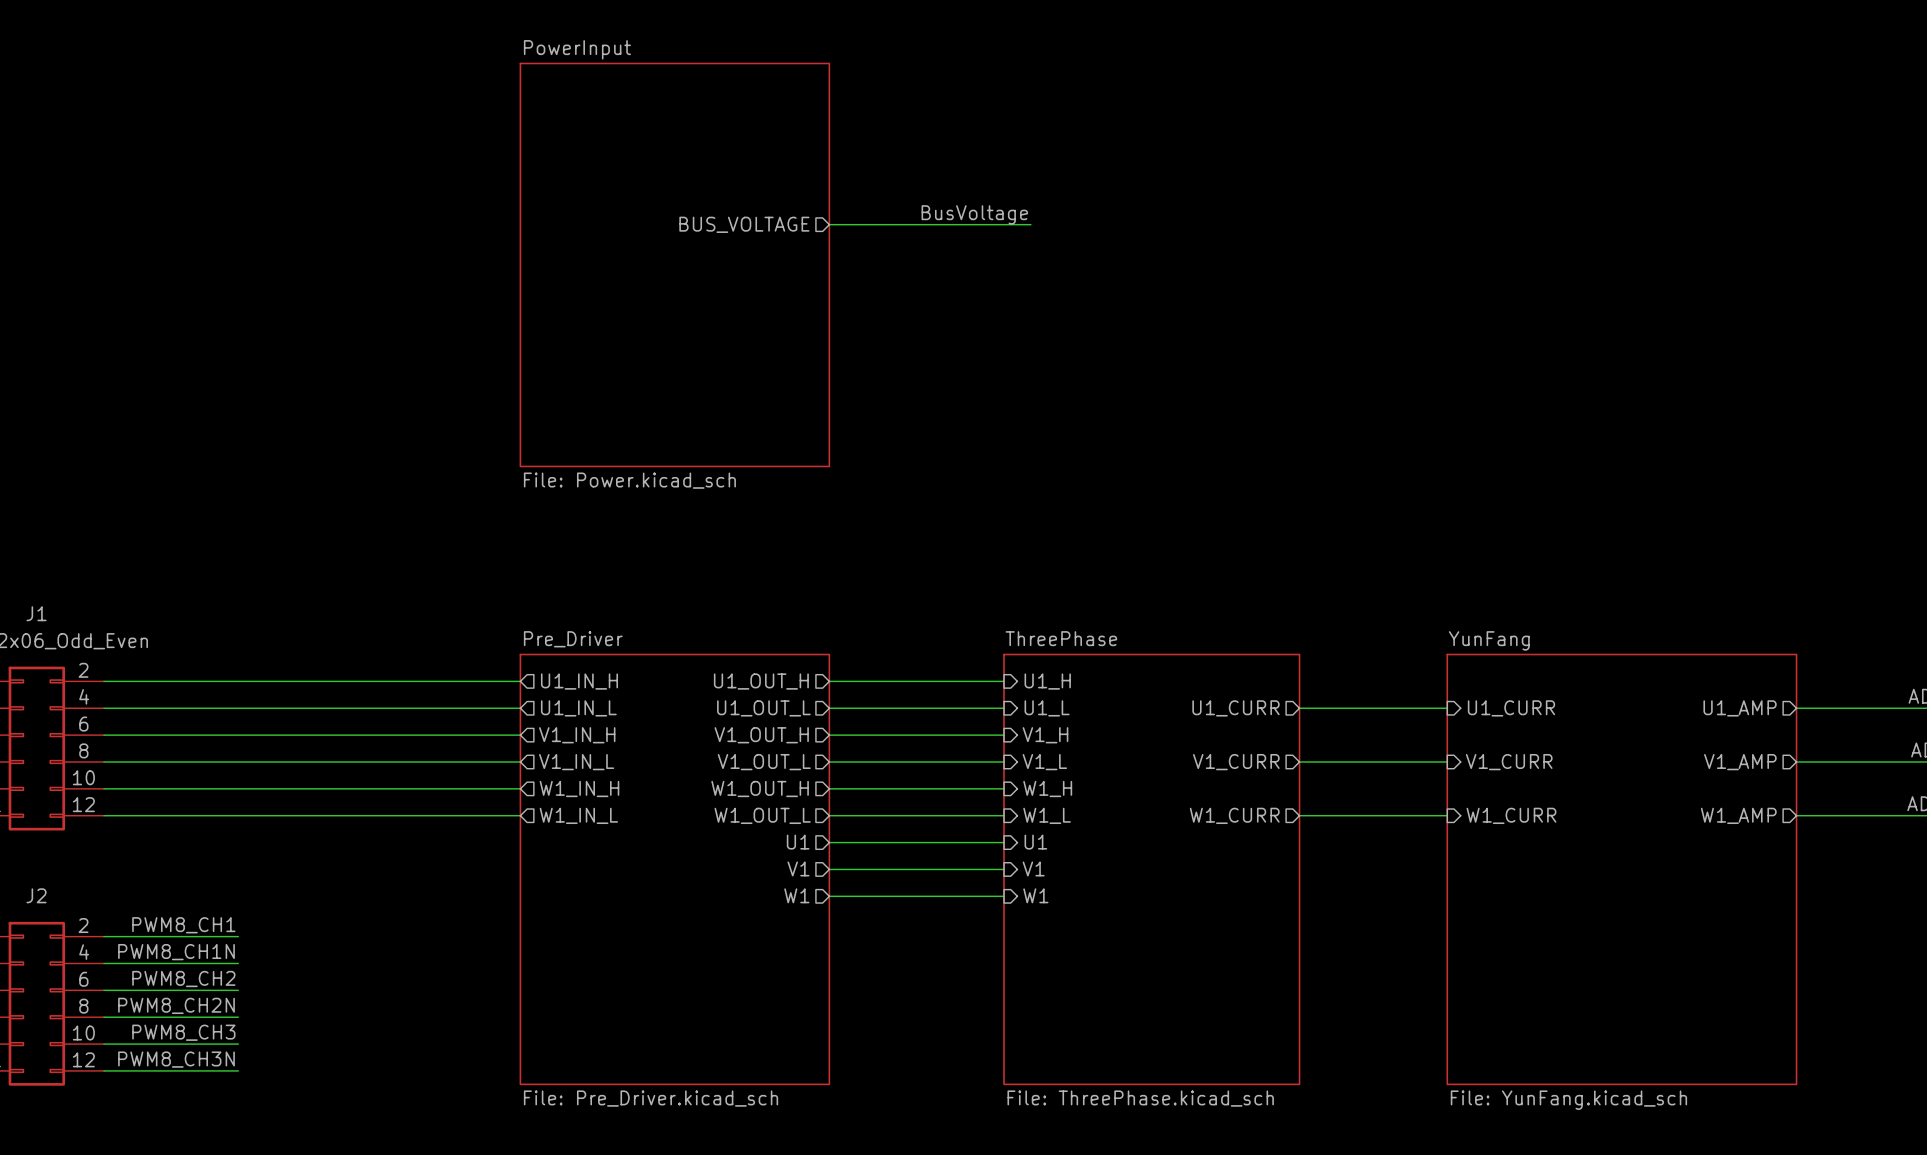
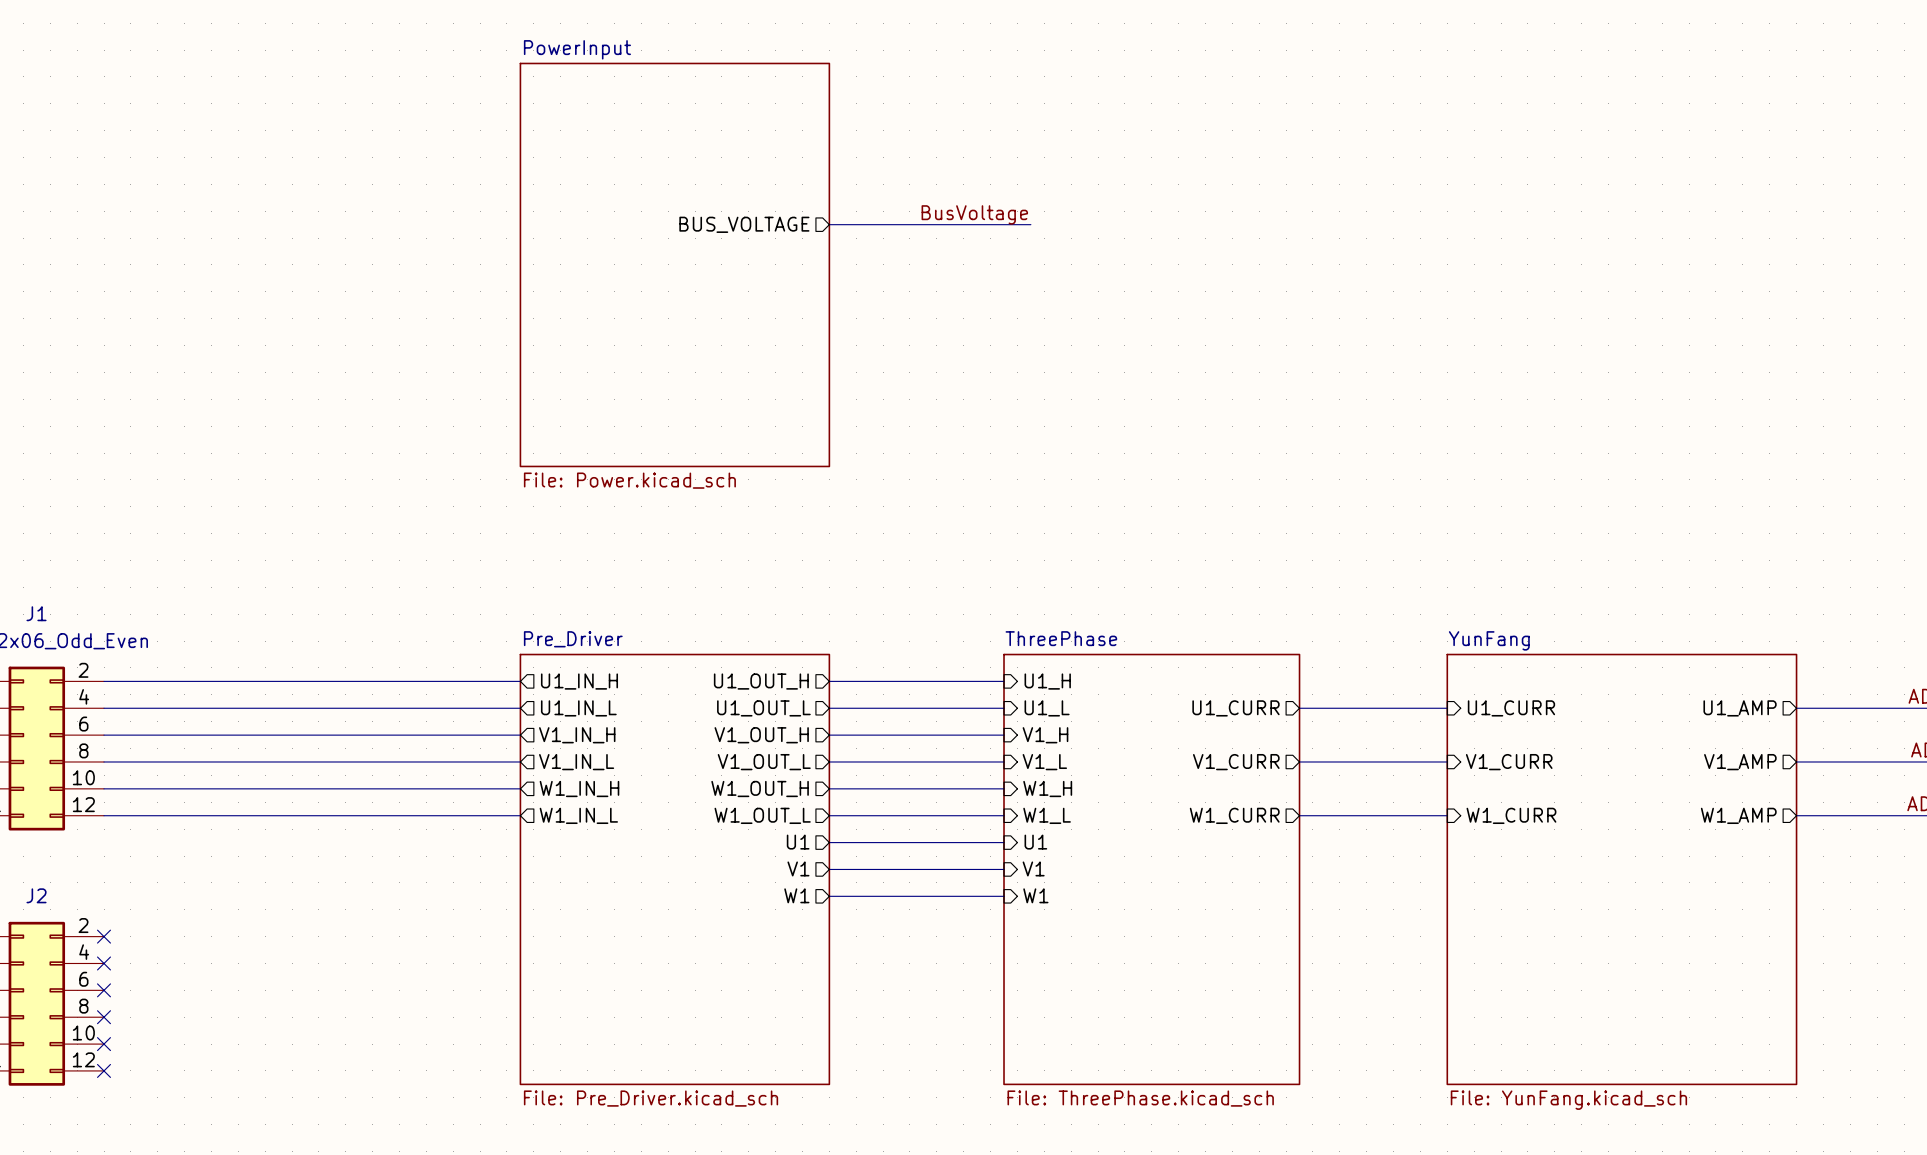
label: PWM8_CH1 (183, 925) -> none
wire: (104, 936) (238, 936) -> none
no-connect mark: none -> (104, 936)
label: PWM8_CH1N (176, 952) -> none
wire: (104, 963) (238, 963) -> none
no-connect mark: none -> (104, 963)
label: PWM8_CH2 (183, 979) -> none
wire: (104, 990) (238, 990) -> none
no-connect mark: none -> (104, 990)
label: PWM8_CH2N (176, 1005) -> none
wire: (104, 1017) (238, 1017) -> none
no-connect mark: none -> (104, 1017)
label: PWM8_CH3 (183, 1032) -> none
wire: (104, 1044) (238, 1044) -> none
no-connect mark: none -> (104, 1044)
label: PWM8_CH3N (176, 1059) -> none
wire: (104, 1070) (238, 1070) -> none
no-connect mark: none -> (104, 1070)

